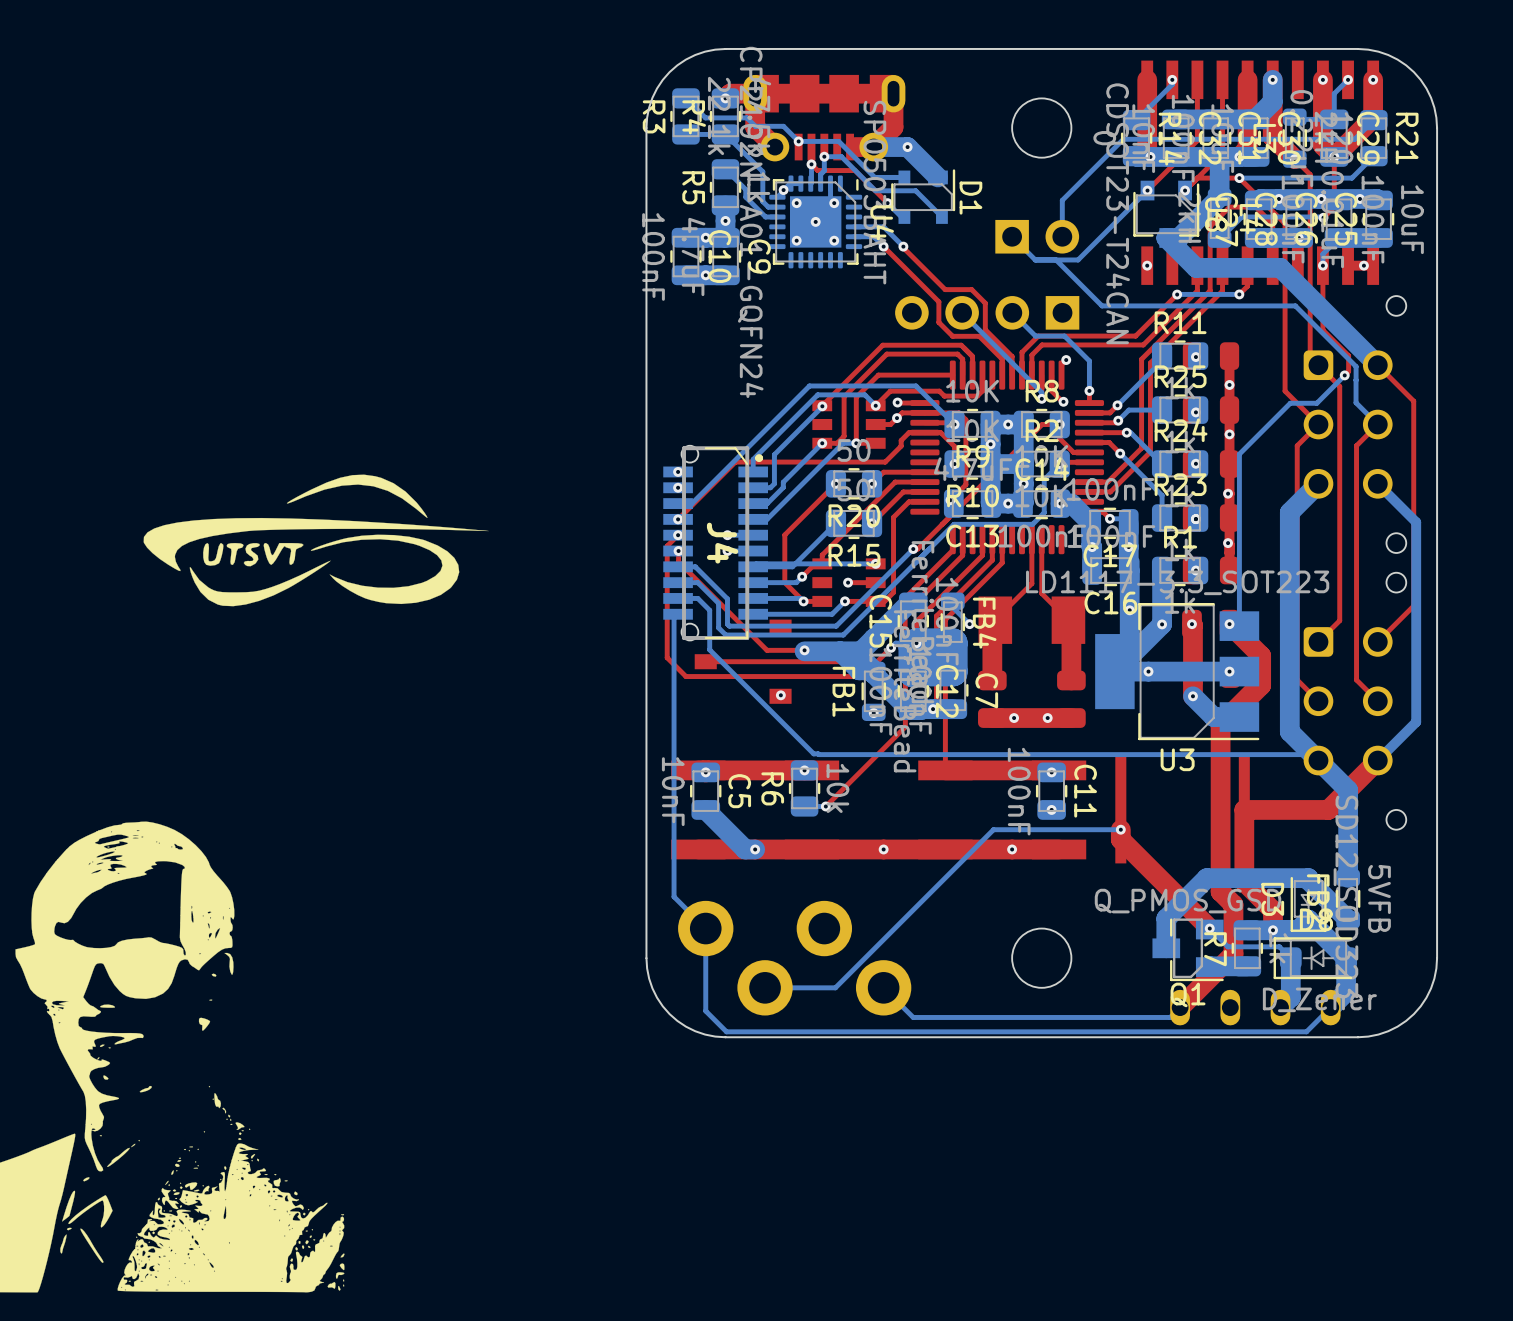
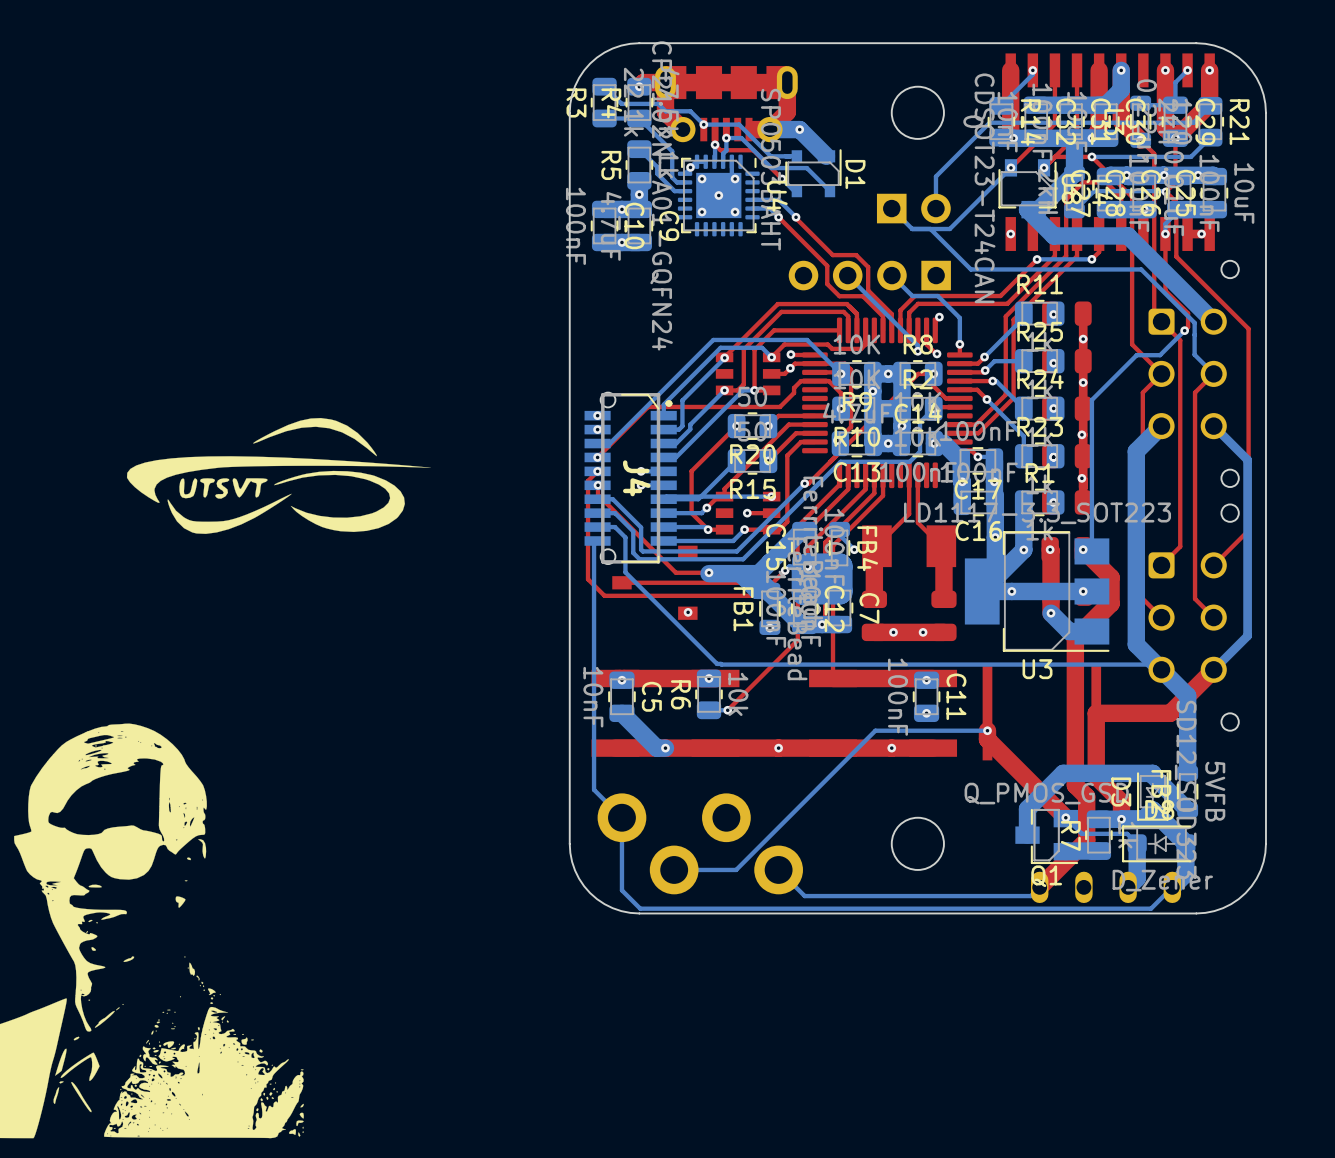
top track: (1377, 365) (1413, 401) (1413, 605) -> (1165, 191) (1176, 202) (1176, 256) (1248, 328) (1248, 530) (1245, 533)

